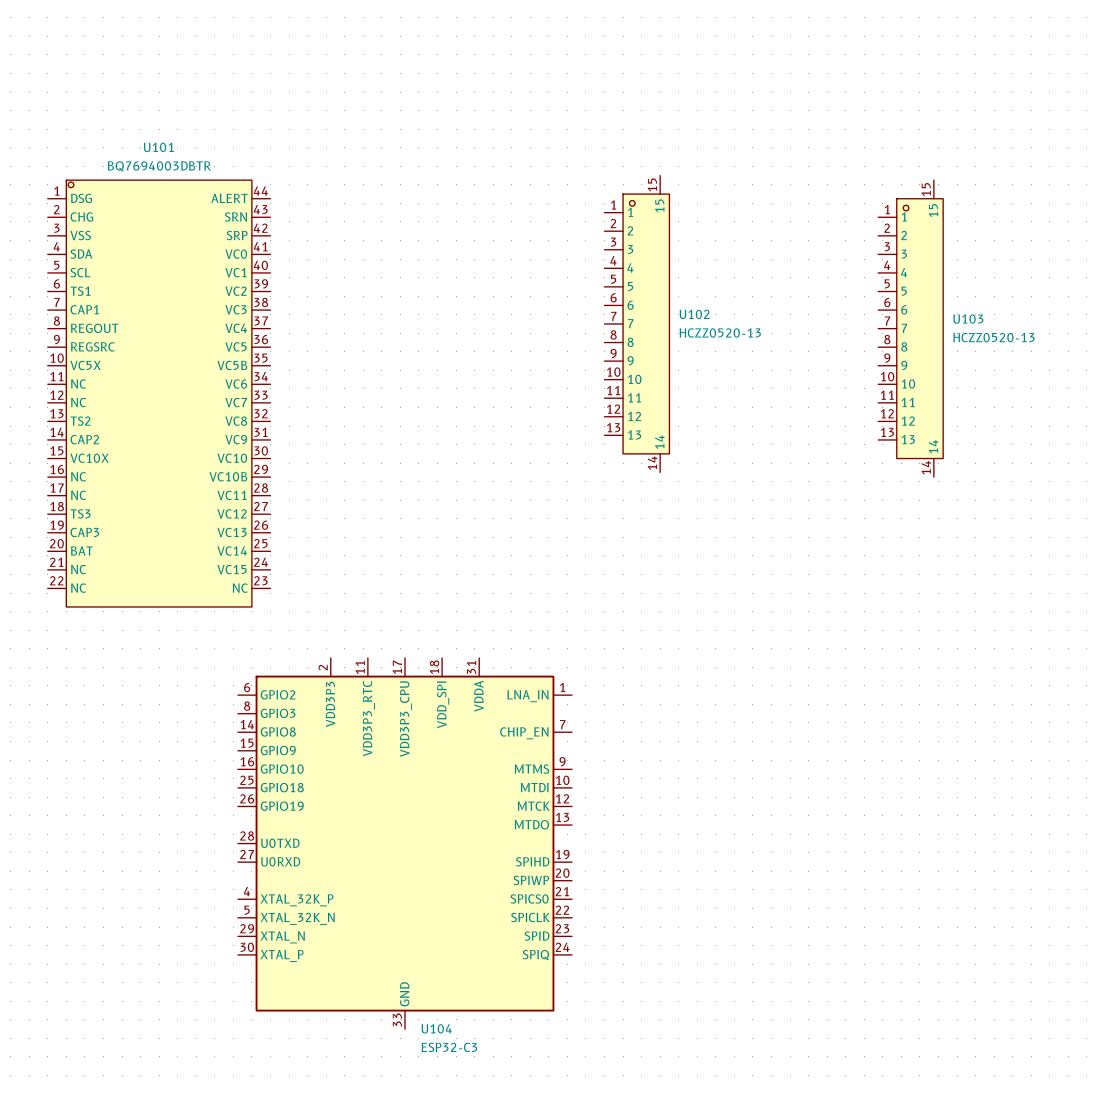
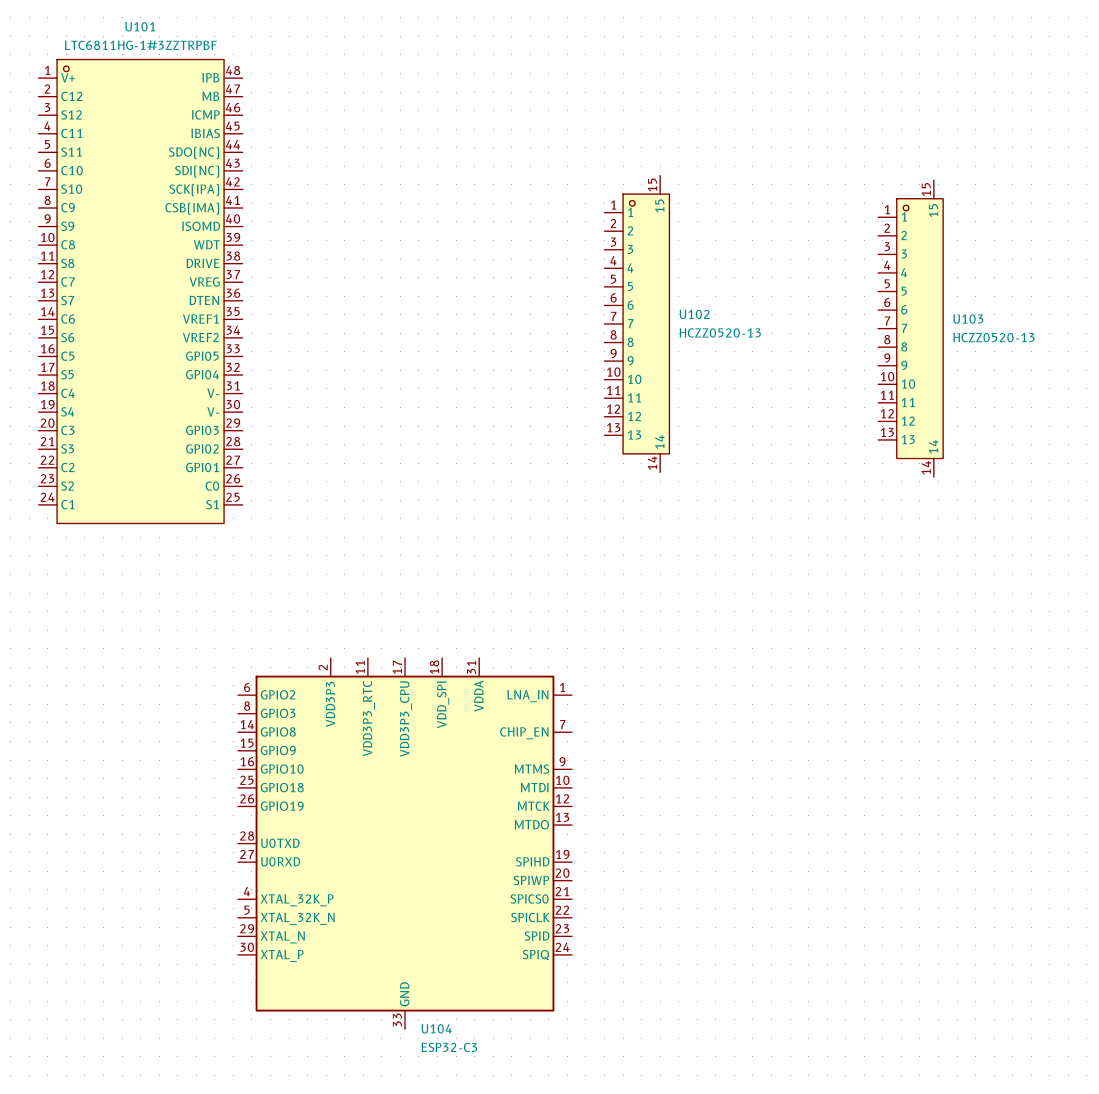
U101 name position: U101 (158, 147) -> U101 (140, 26)
U101 value: BQ7694003DBTR (159, 166) -> LTC6811HG-1#3ZZTRPBF (140, 45)
U101 symbol: [47, 180, 271, 607] -> [38, 59, 243, 524]

